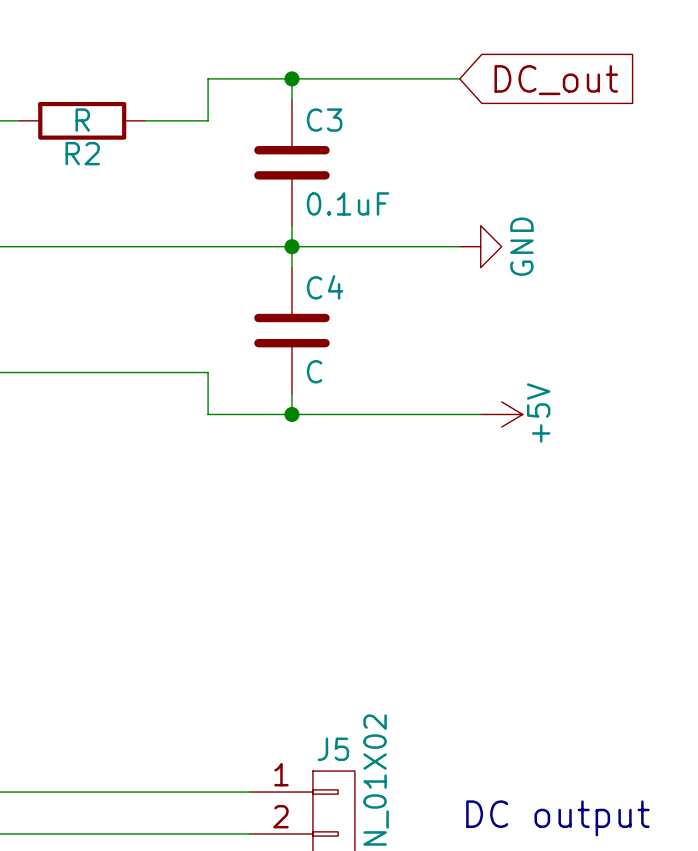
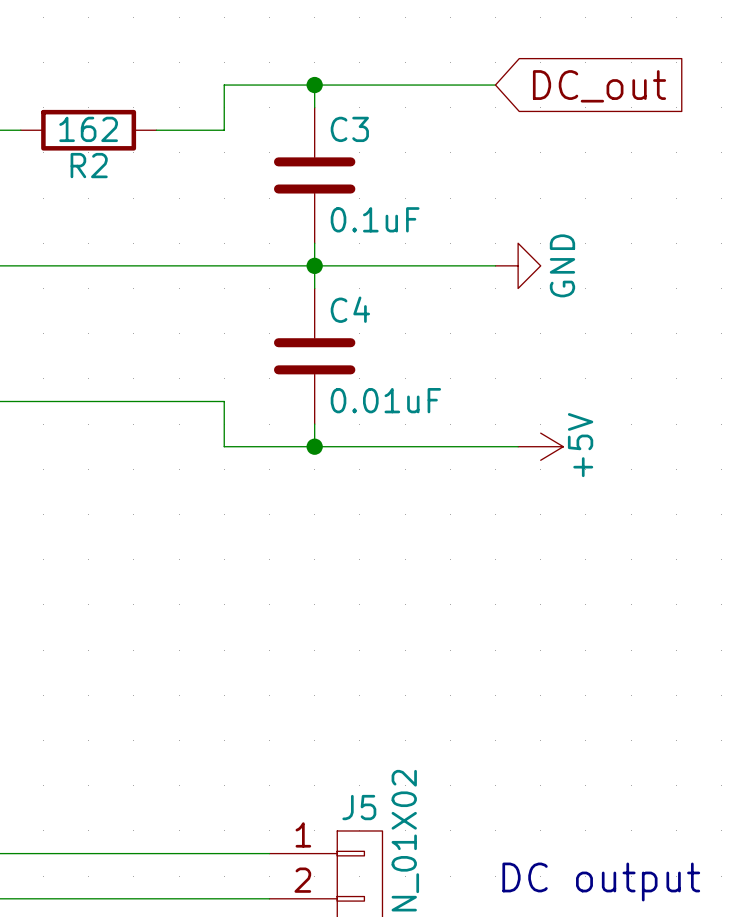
R2 value: R (82, 120) -> 162 (88, 129)
C4 value: C (314, 371) -> 0.01uF (385, 400)

